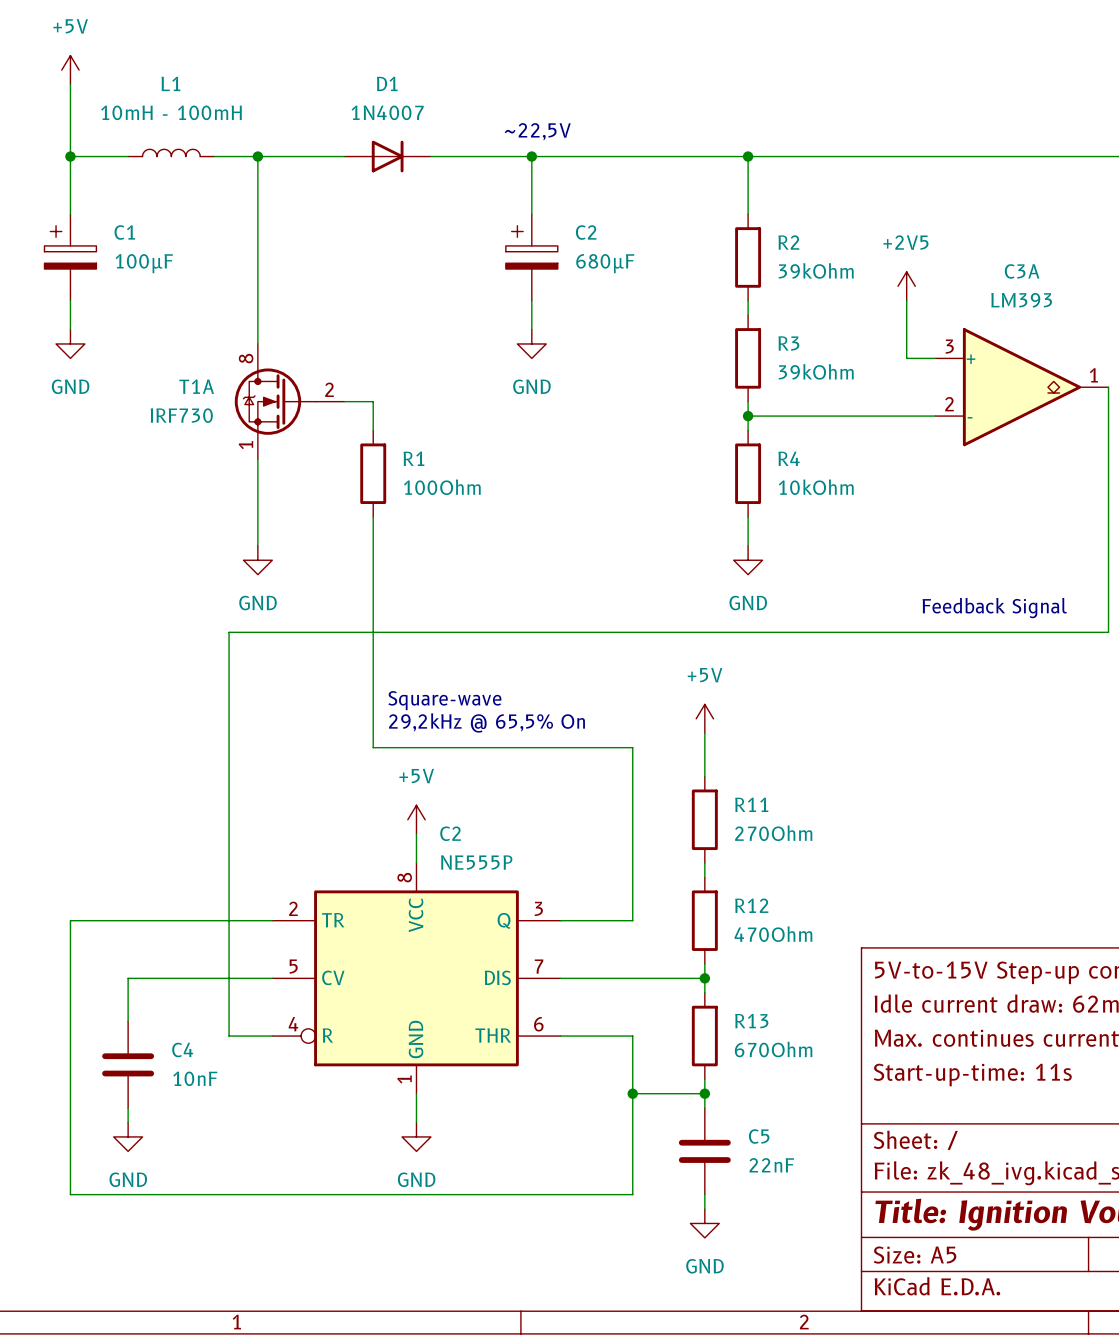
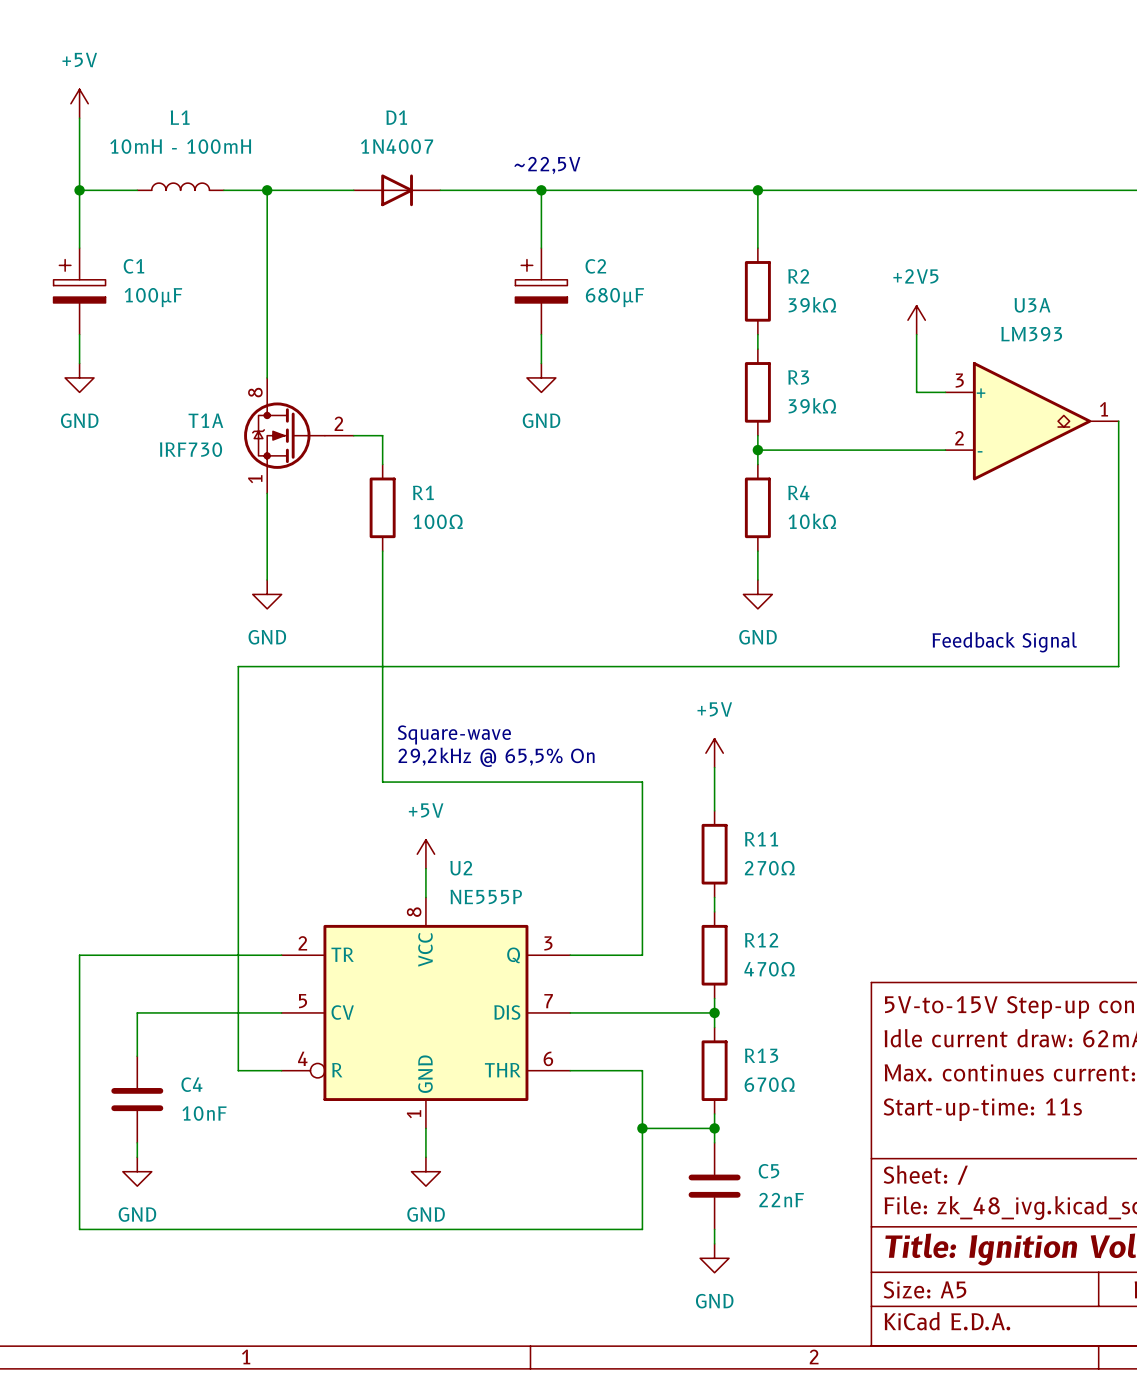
R2 value: 39kOhm (816, 270) -> 39kΩ (812, 304)
C3A name: C3A (1022, 271) -> U3A (1032, 305)
R3 value: 39kOhm (816, 371) -> 39kΩ (812, 405)
R1 value: 100Ohm (442, 487) -> 100Ω (438, 521)
R4 value: 10kOhm (816, 487) -> 10kΩ (812, 521)
C2 name: C2 (450, 833) -> U2 (461, 868)
R11 value: 270Ohm (773, 833) -> 270Ω (769, 868)
R12 value: 470Ohm (773, 934) -> 470Ω (769, 969)
R13 value: 670Ohm (773, 1049) -> 670Ω (769, 1084)

